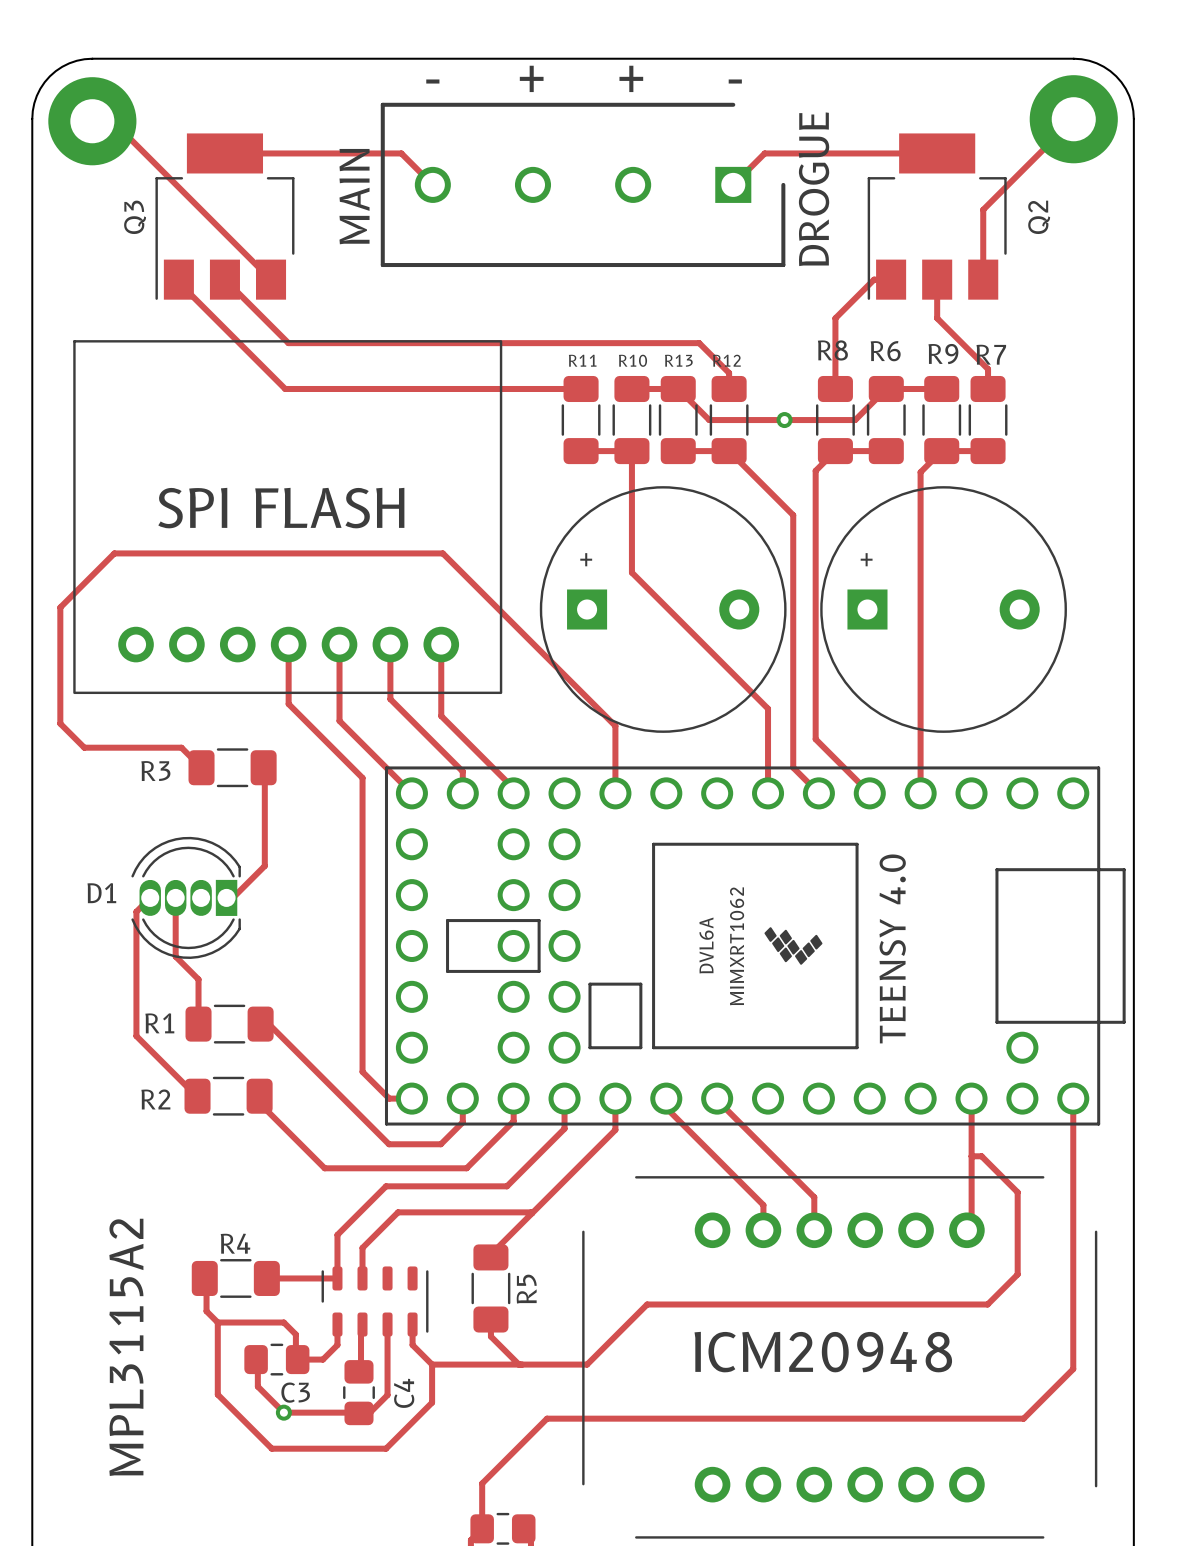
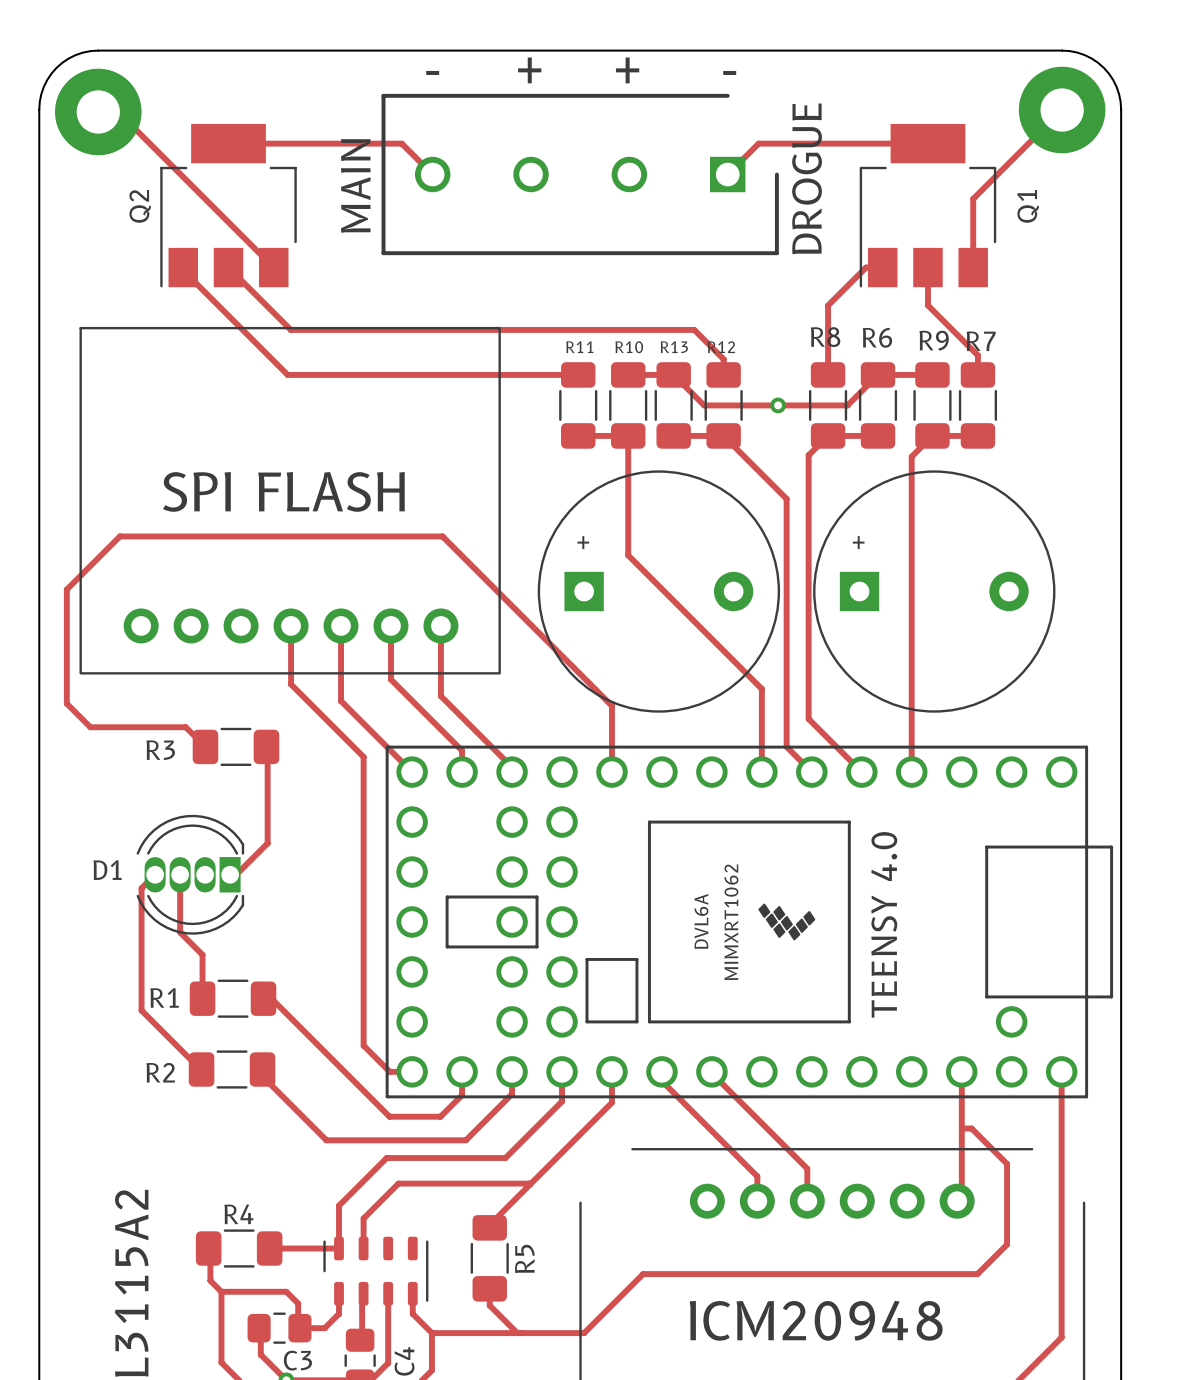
Q3 name: Q3 (135, 217) -> Q2 (140, 206)
Q2 name: Q2 (1039, 217) -> Q1 (1028, 206)

